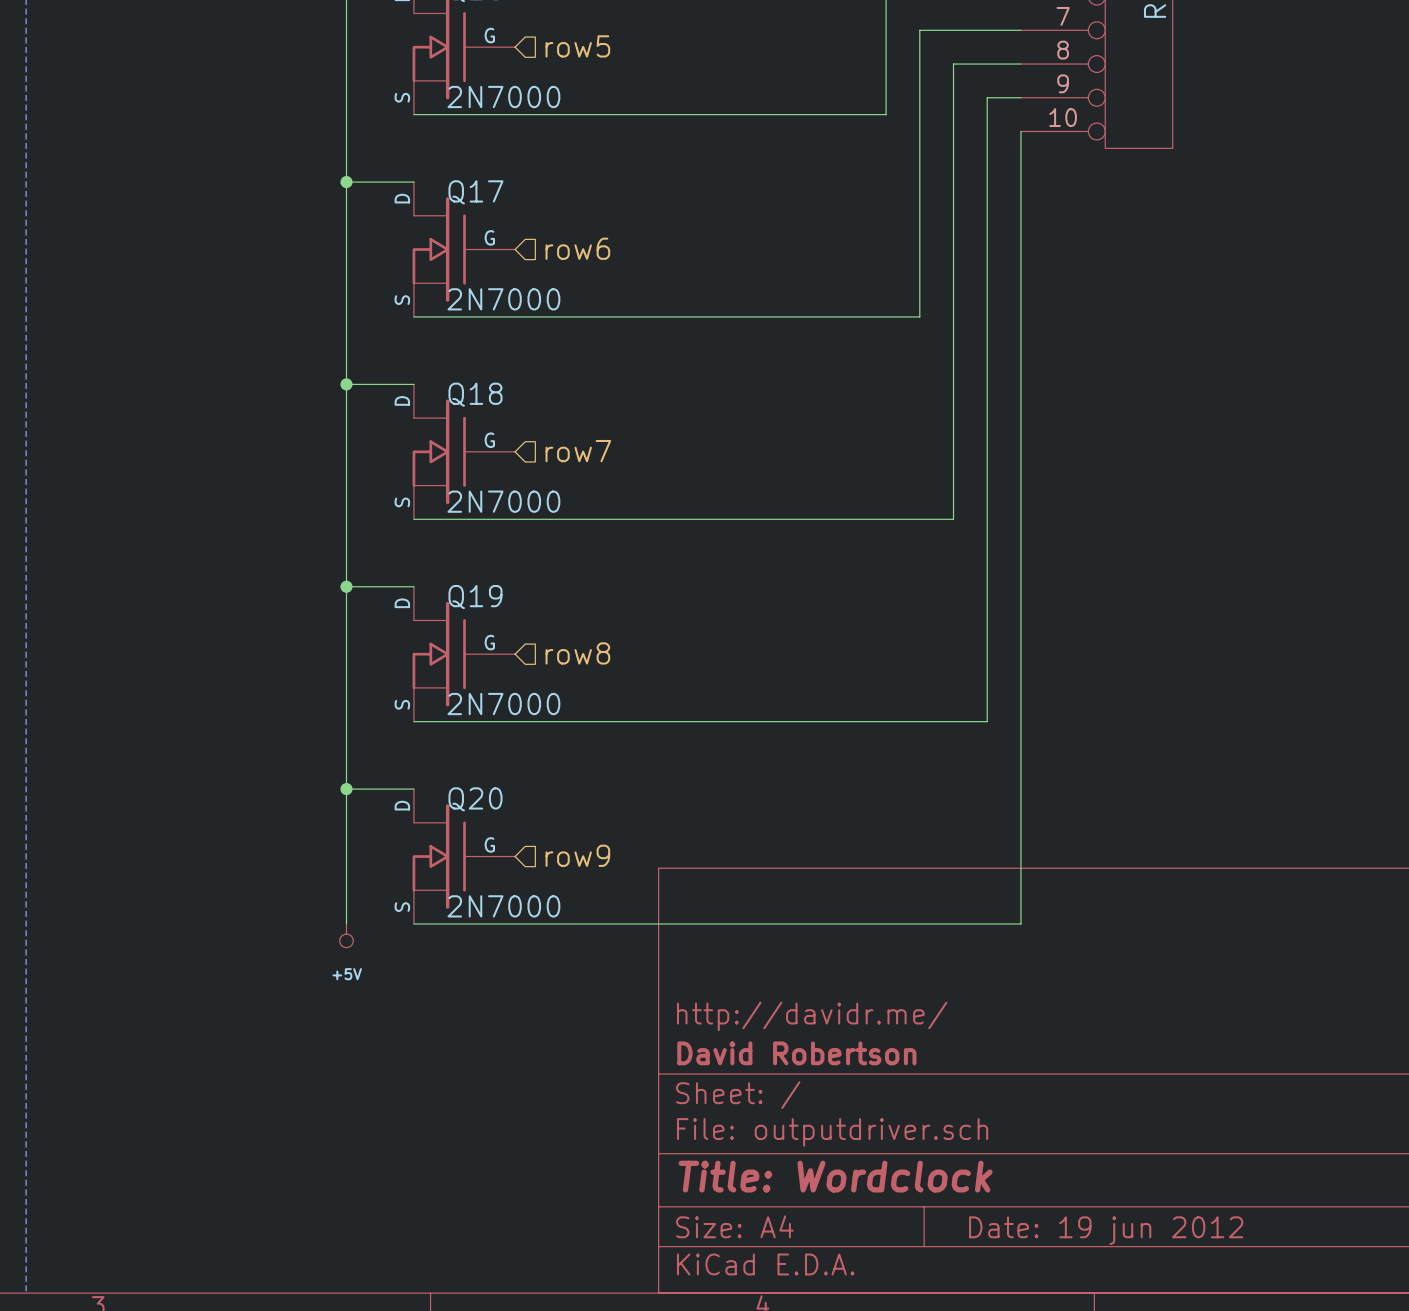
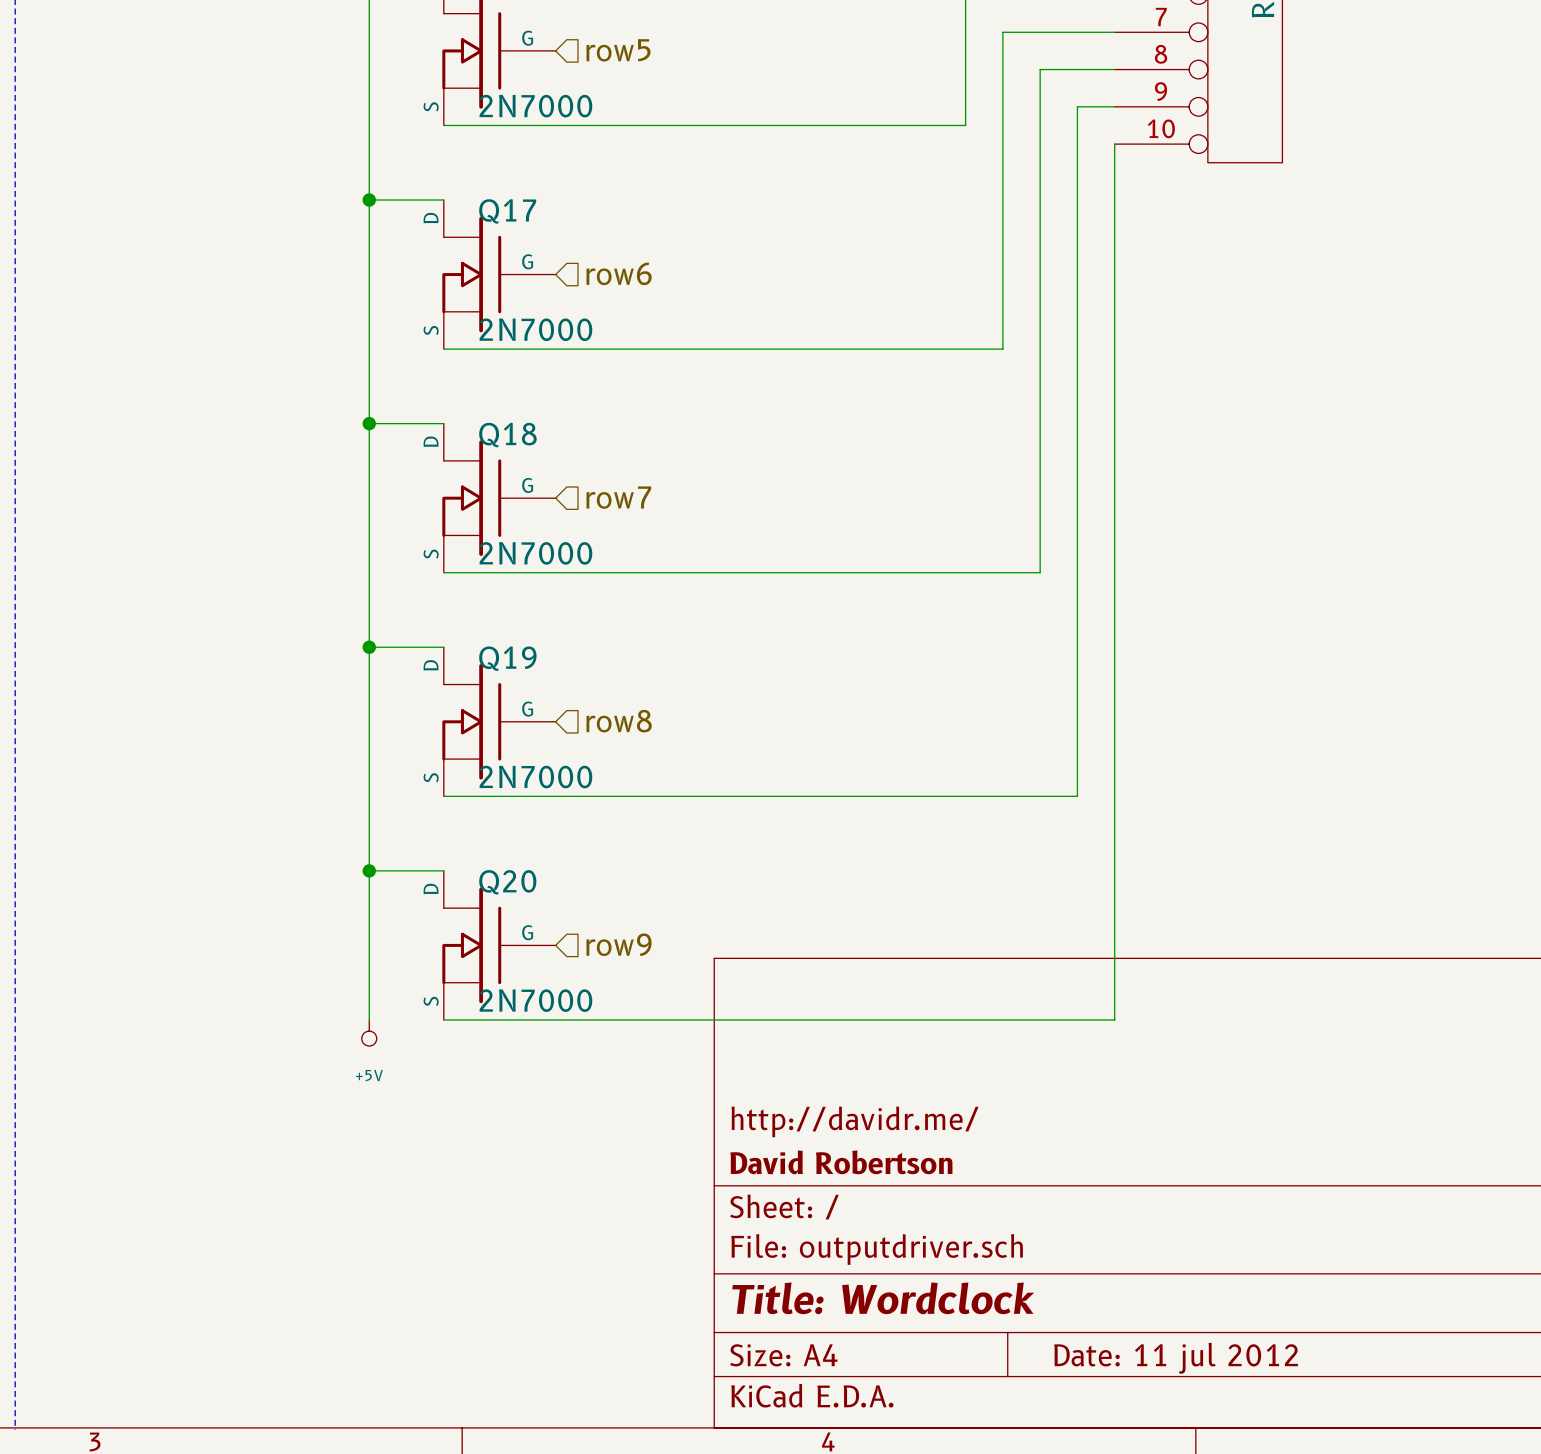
title block: Date: 19 jun 2012 (1106, 1230) -> Date: 11 jul 2012 (1176, 1358)

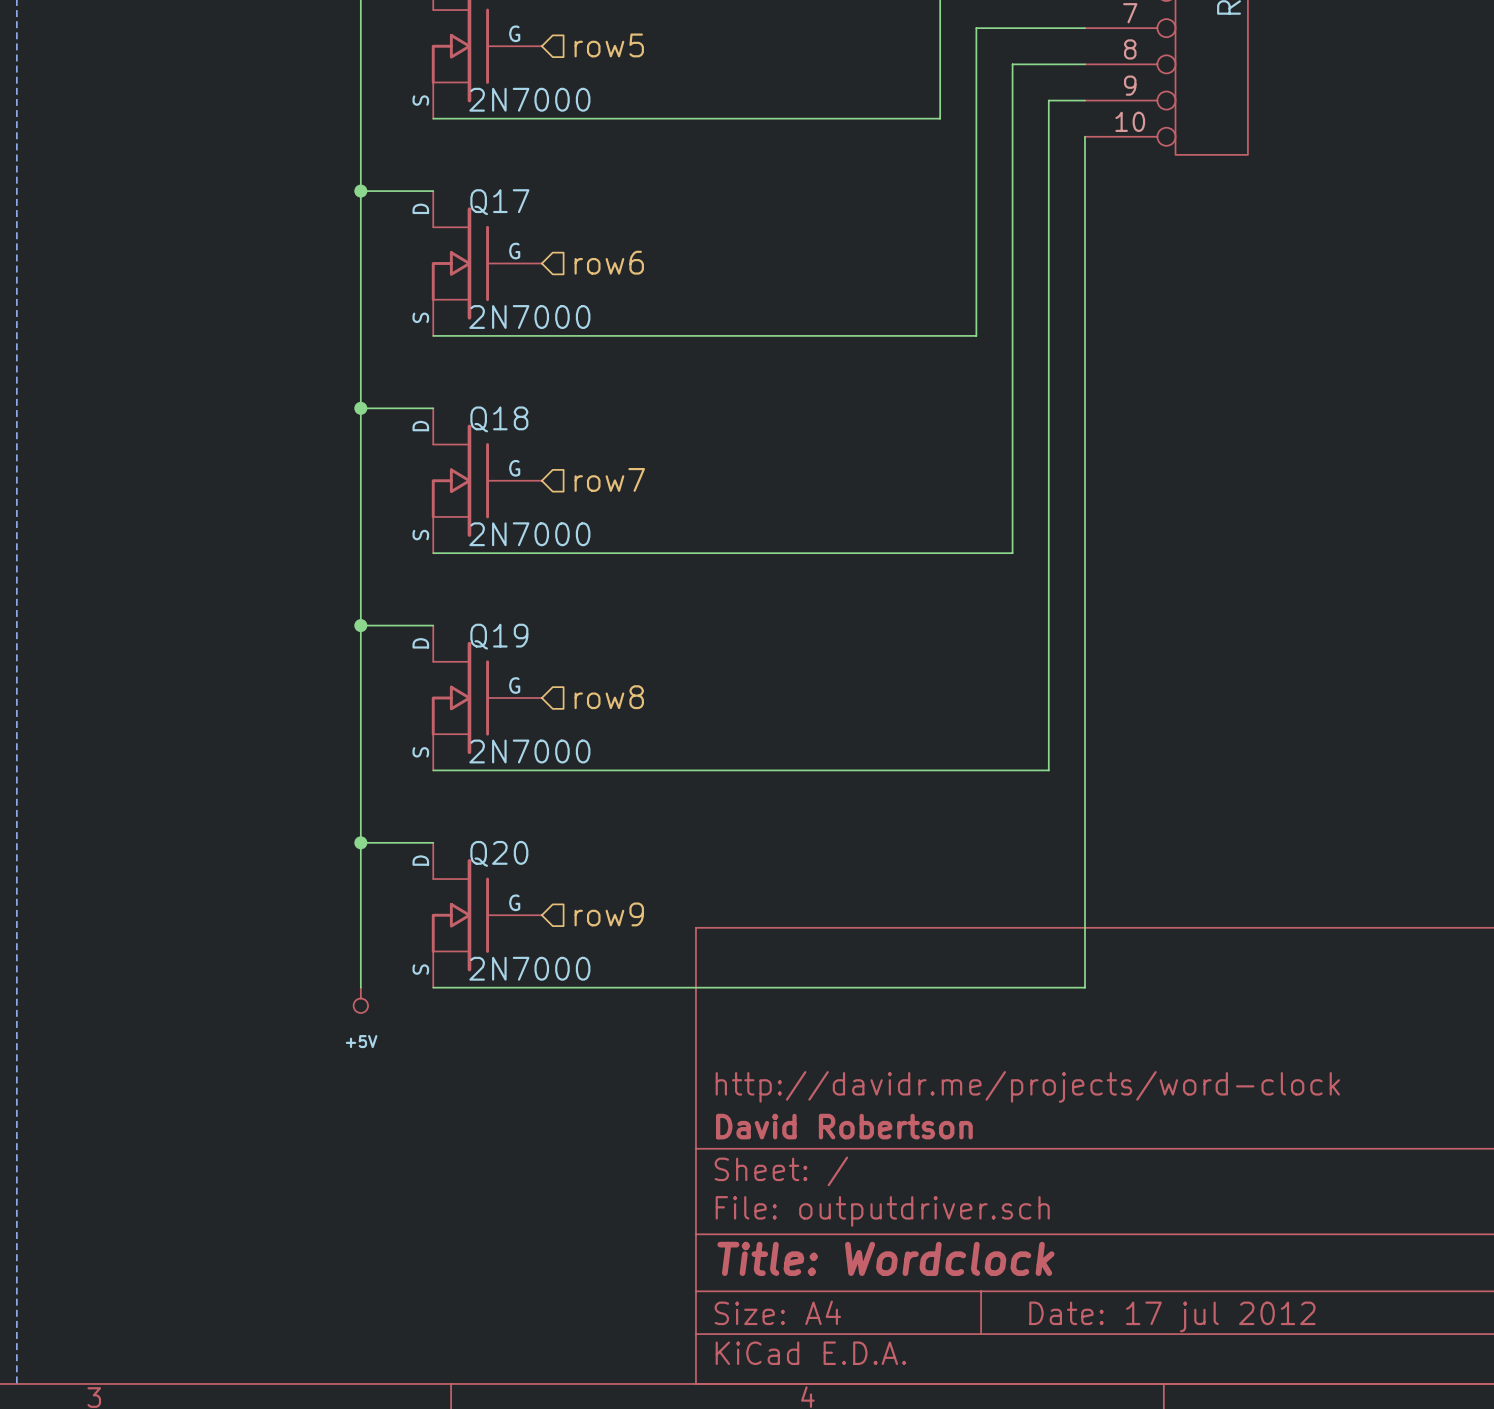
title block: http://davidr.me/ (855, 1121) -> http://davidr.me/projects/word-clock (1027, 1086)
title block: Date: 11 jul 2012 (1176, 1358) -> Date: 17 jul 2012 (1172, 1316)

